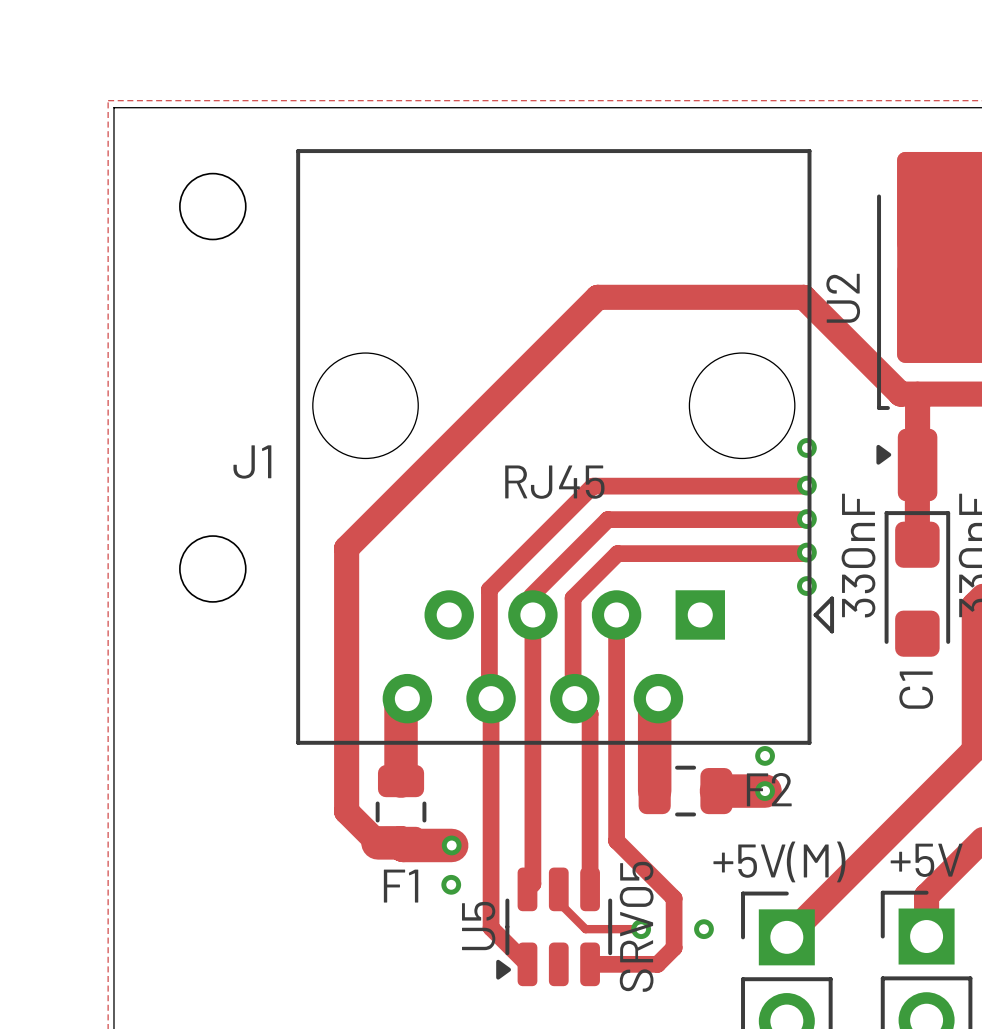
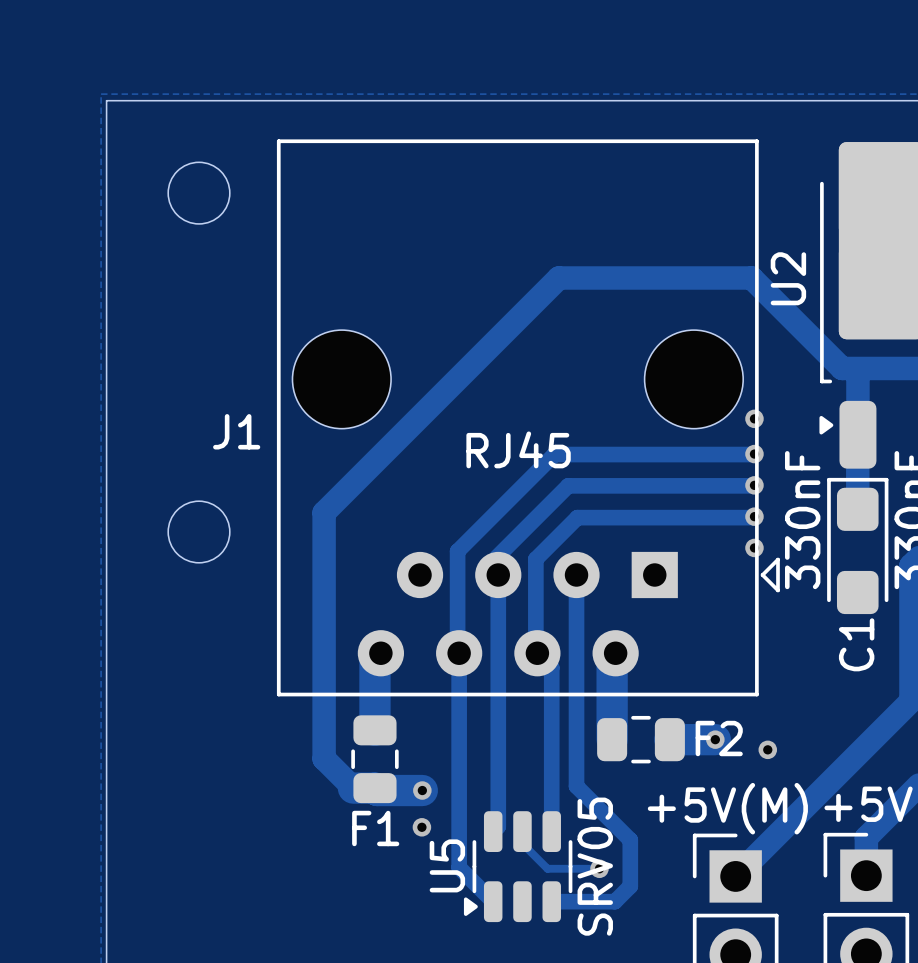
via position: (765, 755) -> (767, 749)
via: (703, 929) -> none

